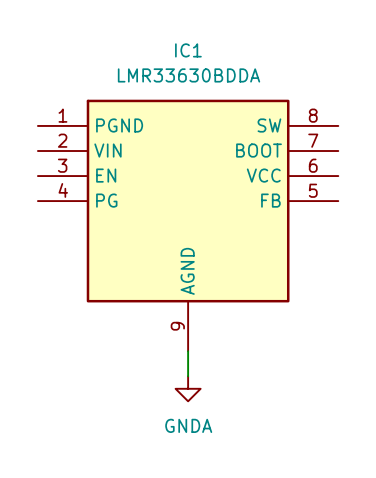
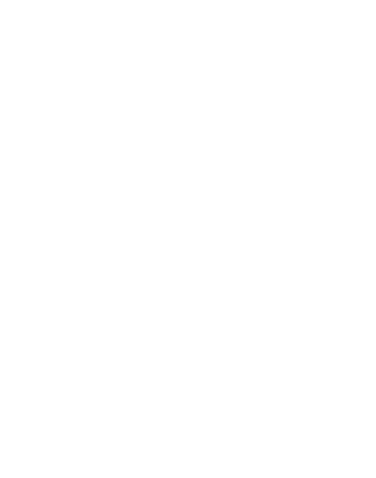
IC1: LMR33630BDDA (188, 225) -> none
wire: (188, 351) (188, 376) -> none
power symbol: GNDA (188, 388) -> none

